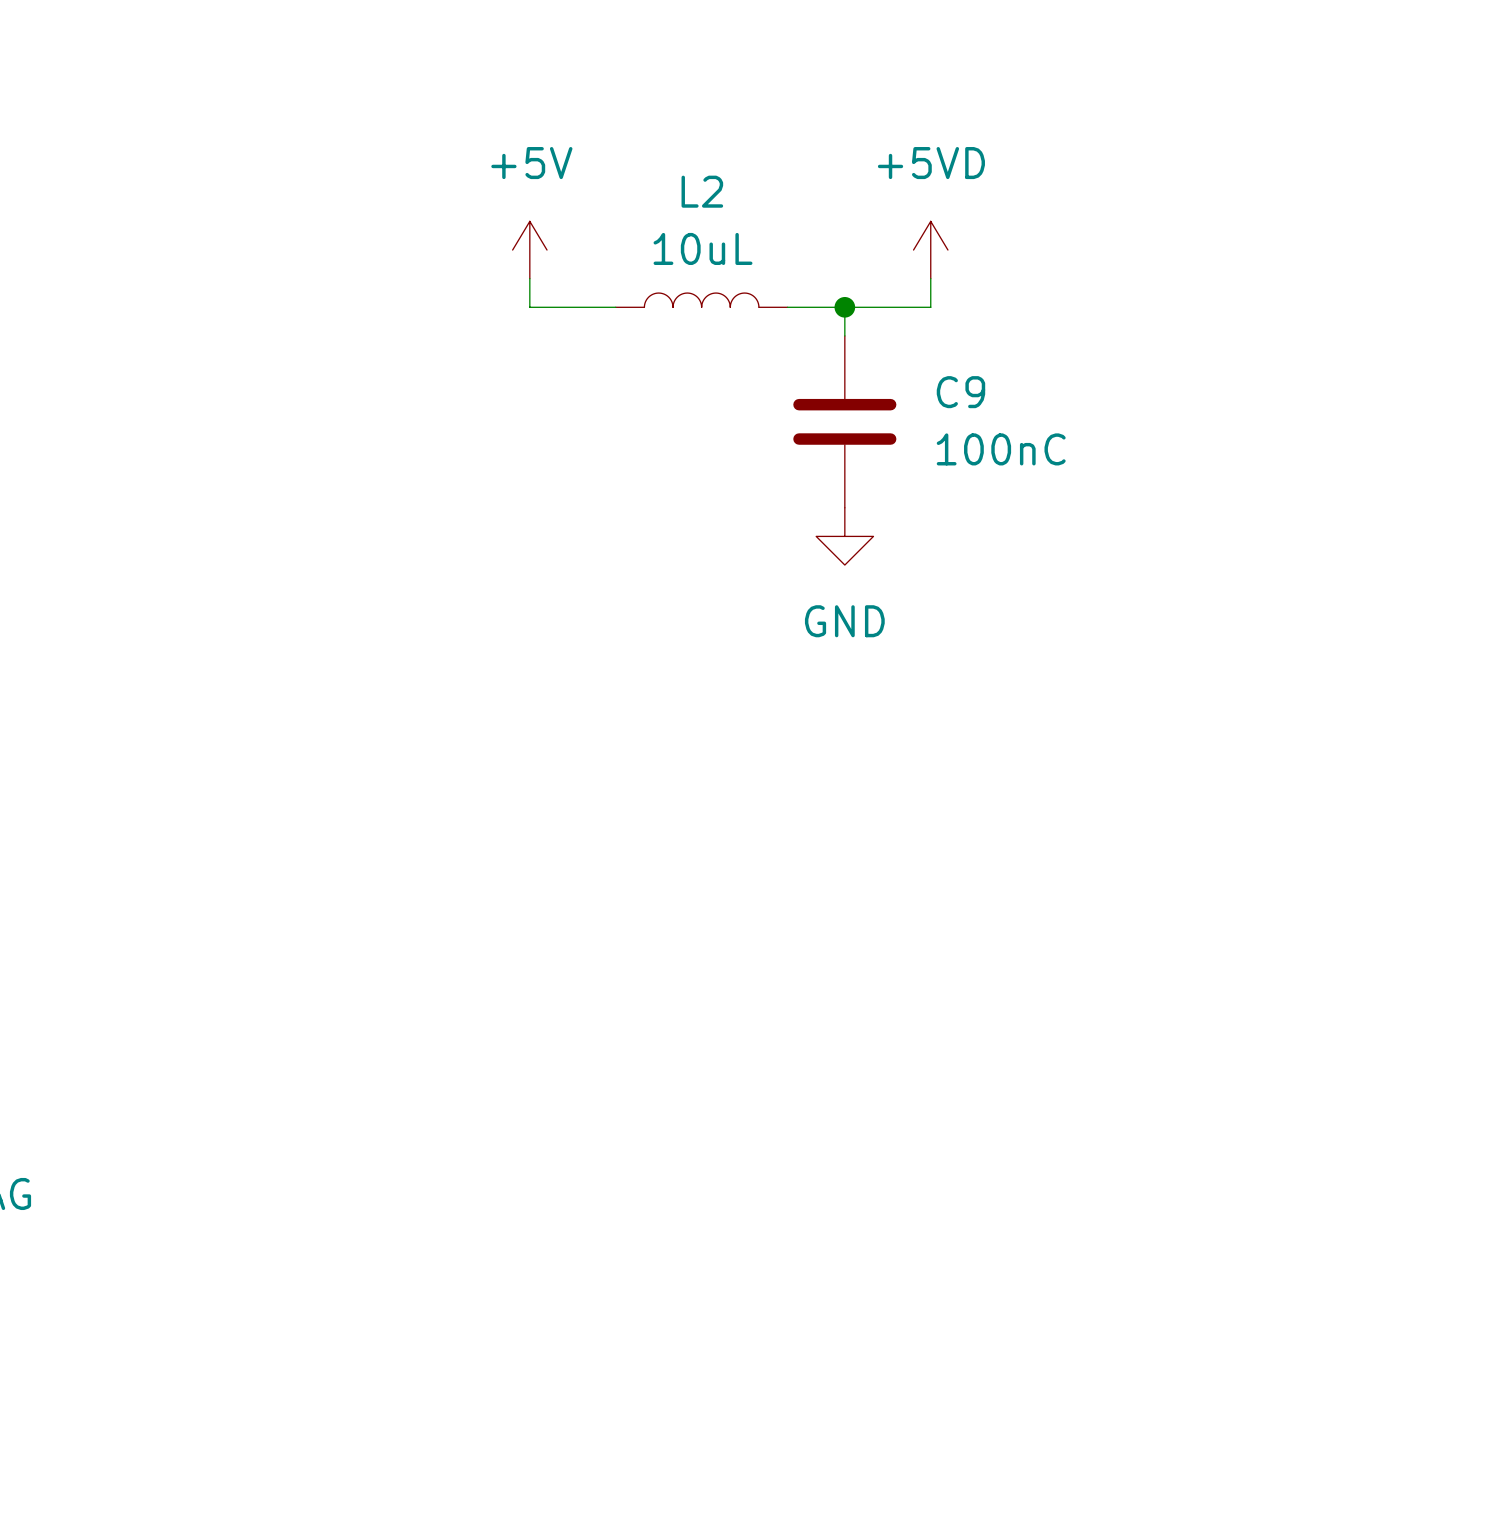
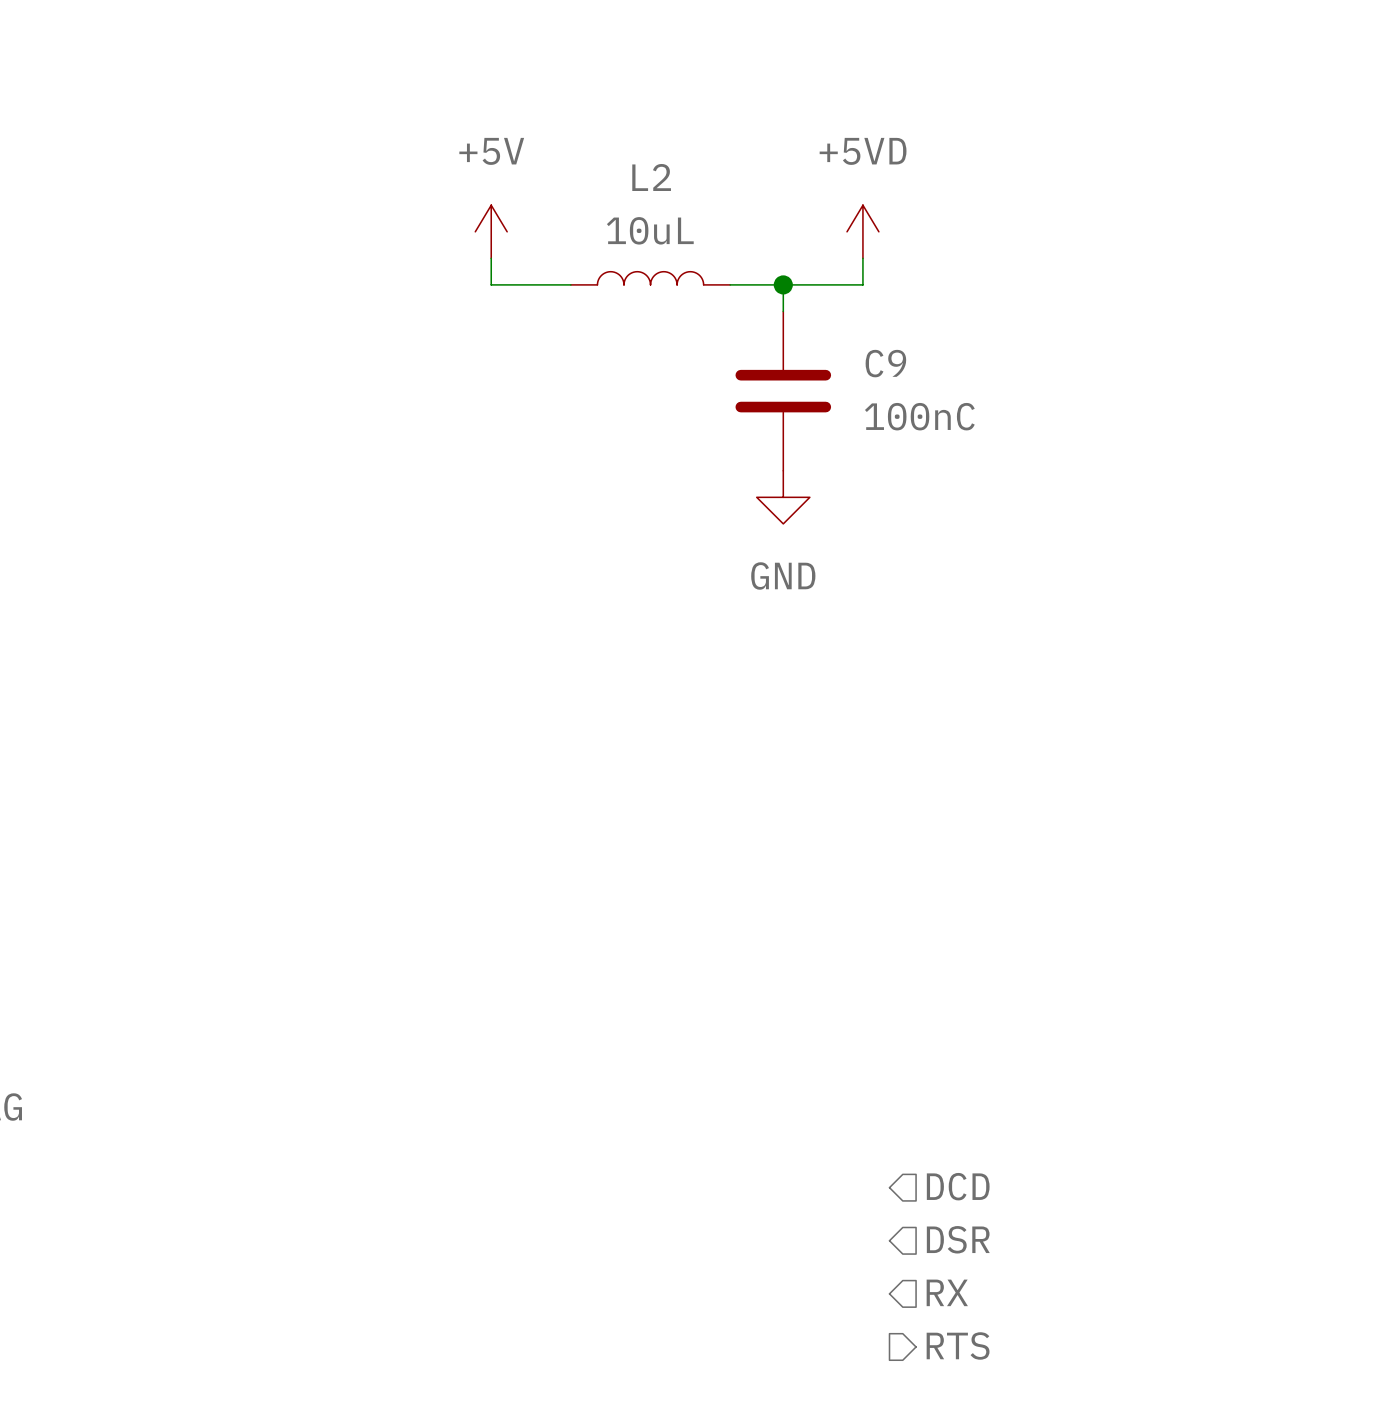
sheet pin: none -> DCD (958, 1186)
sheet pin: none -> DSR (958, 1239)
sheet pin: none -> RX (947, 1292)
sheet pin: none -> RTS (958, 1345)

